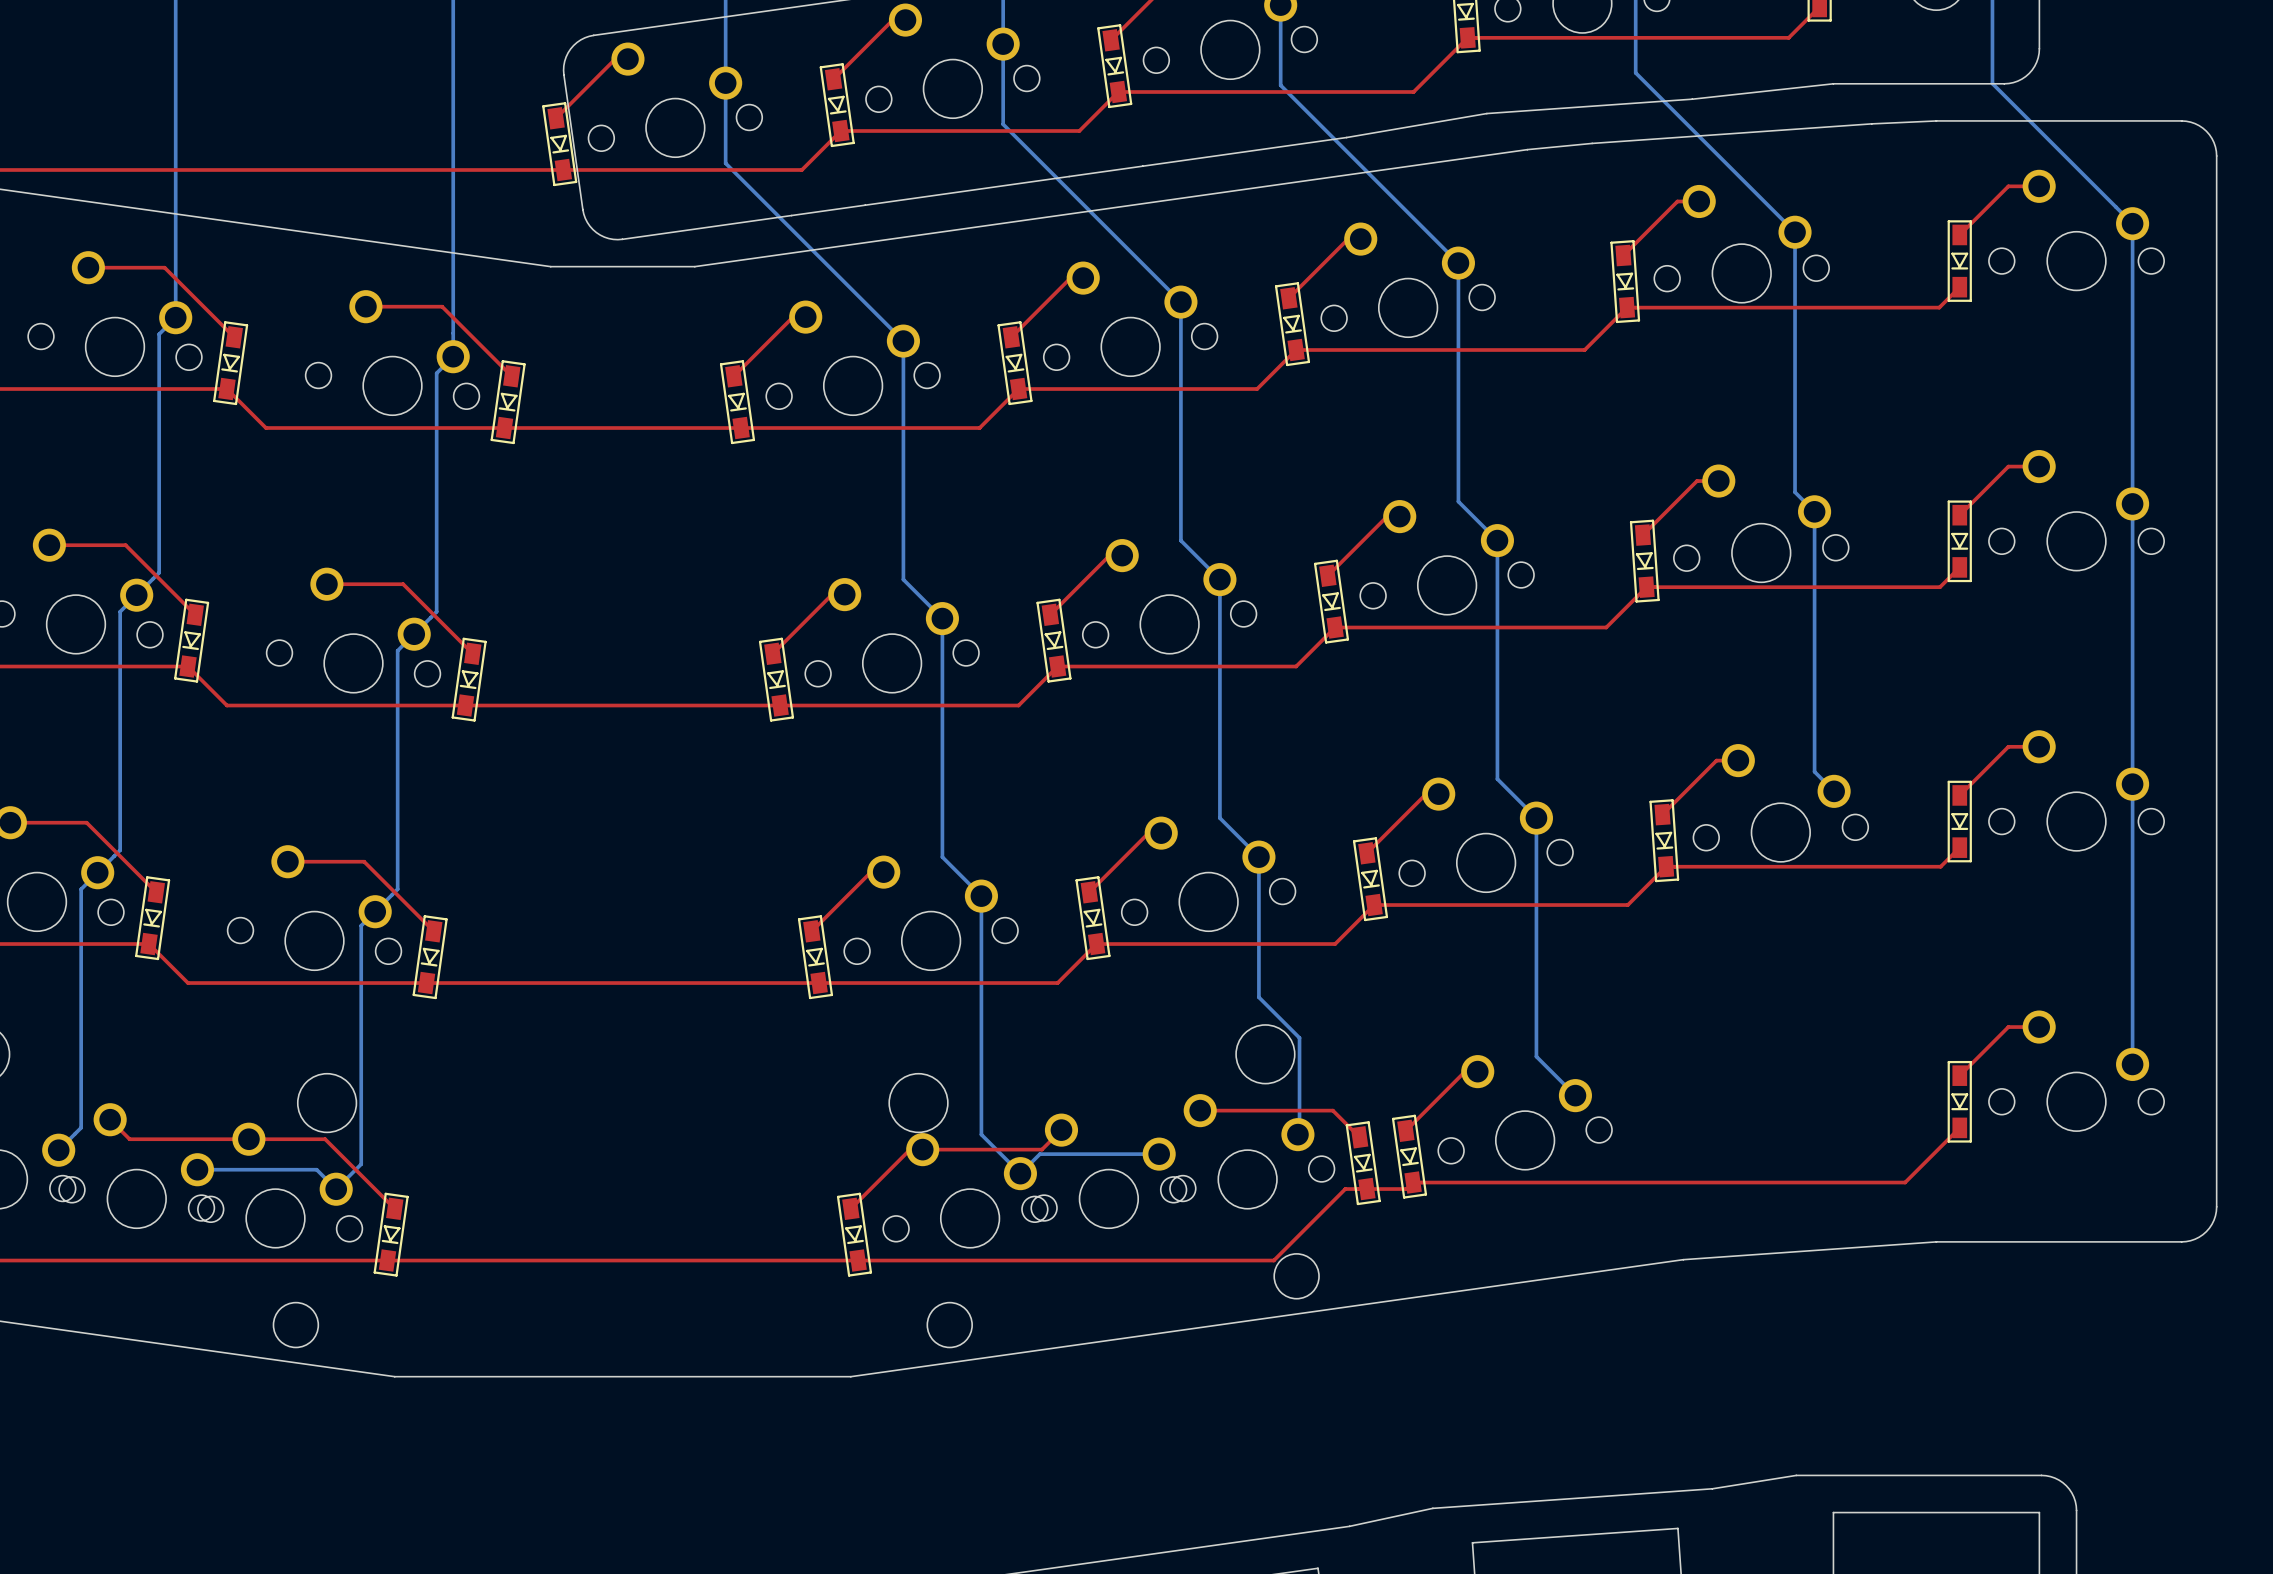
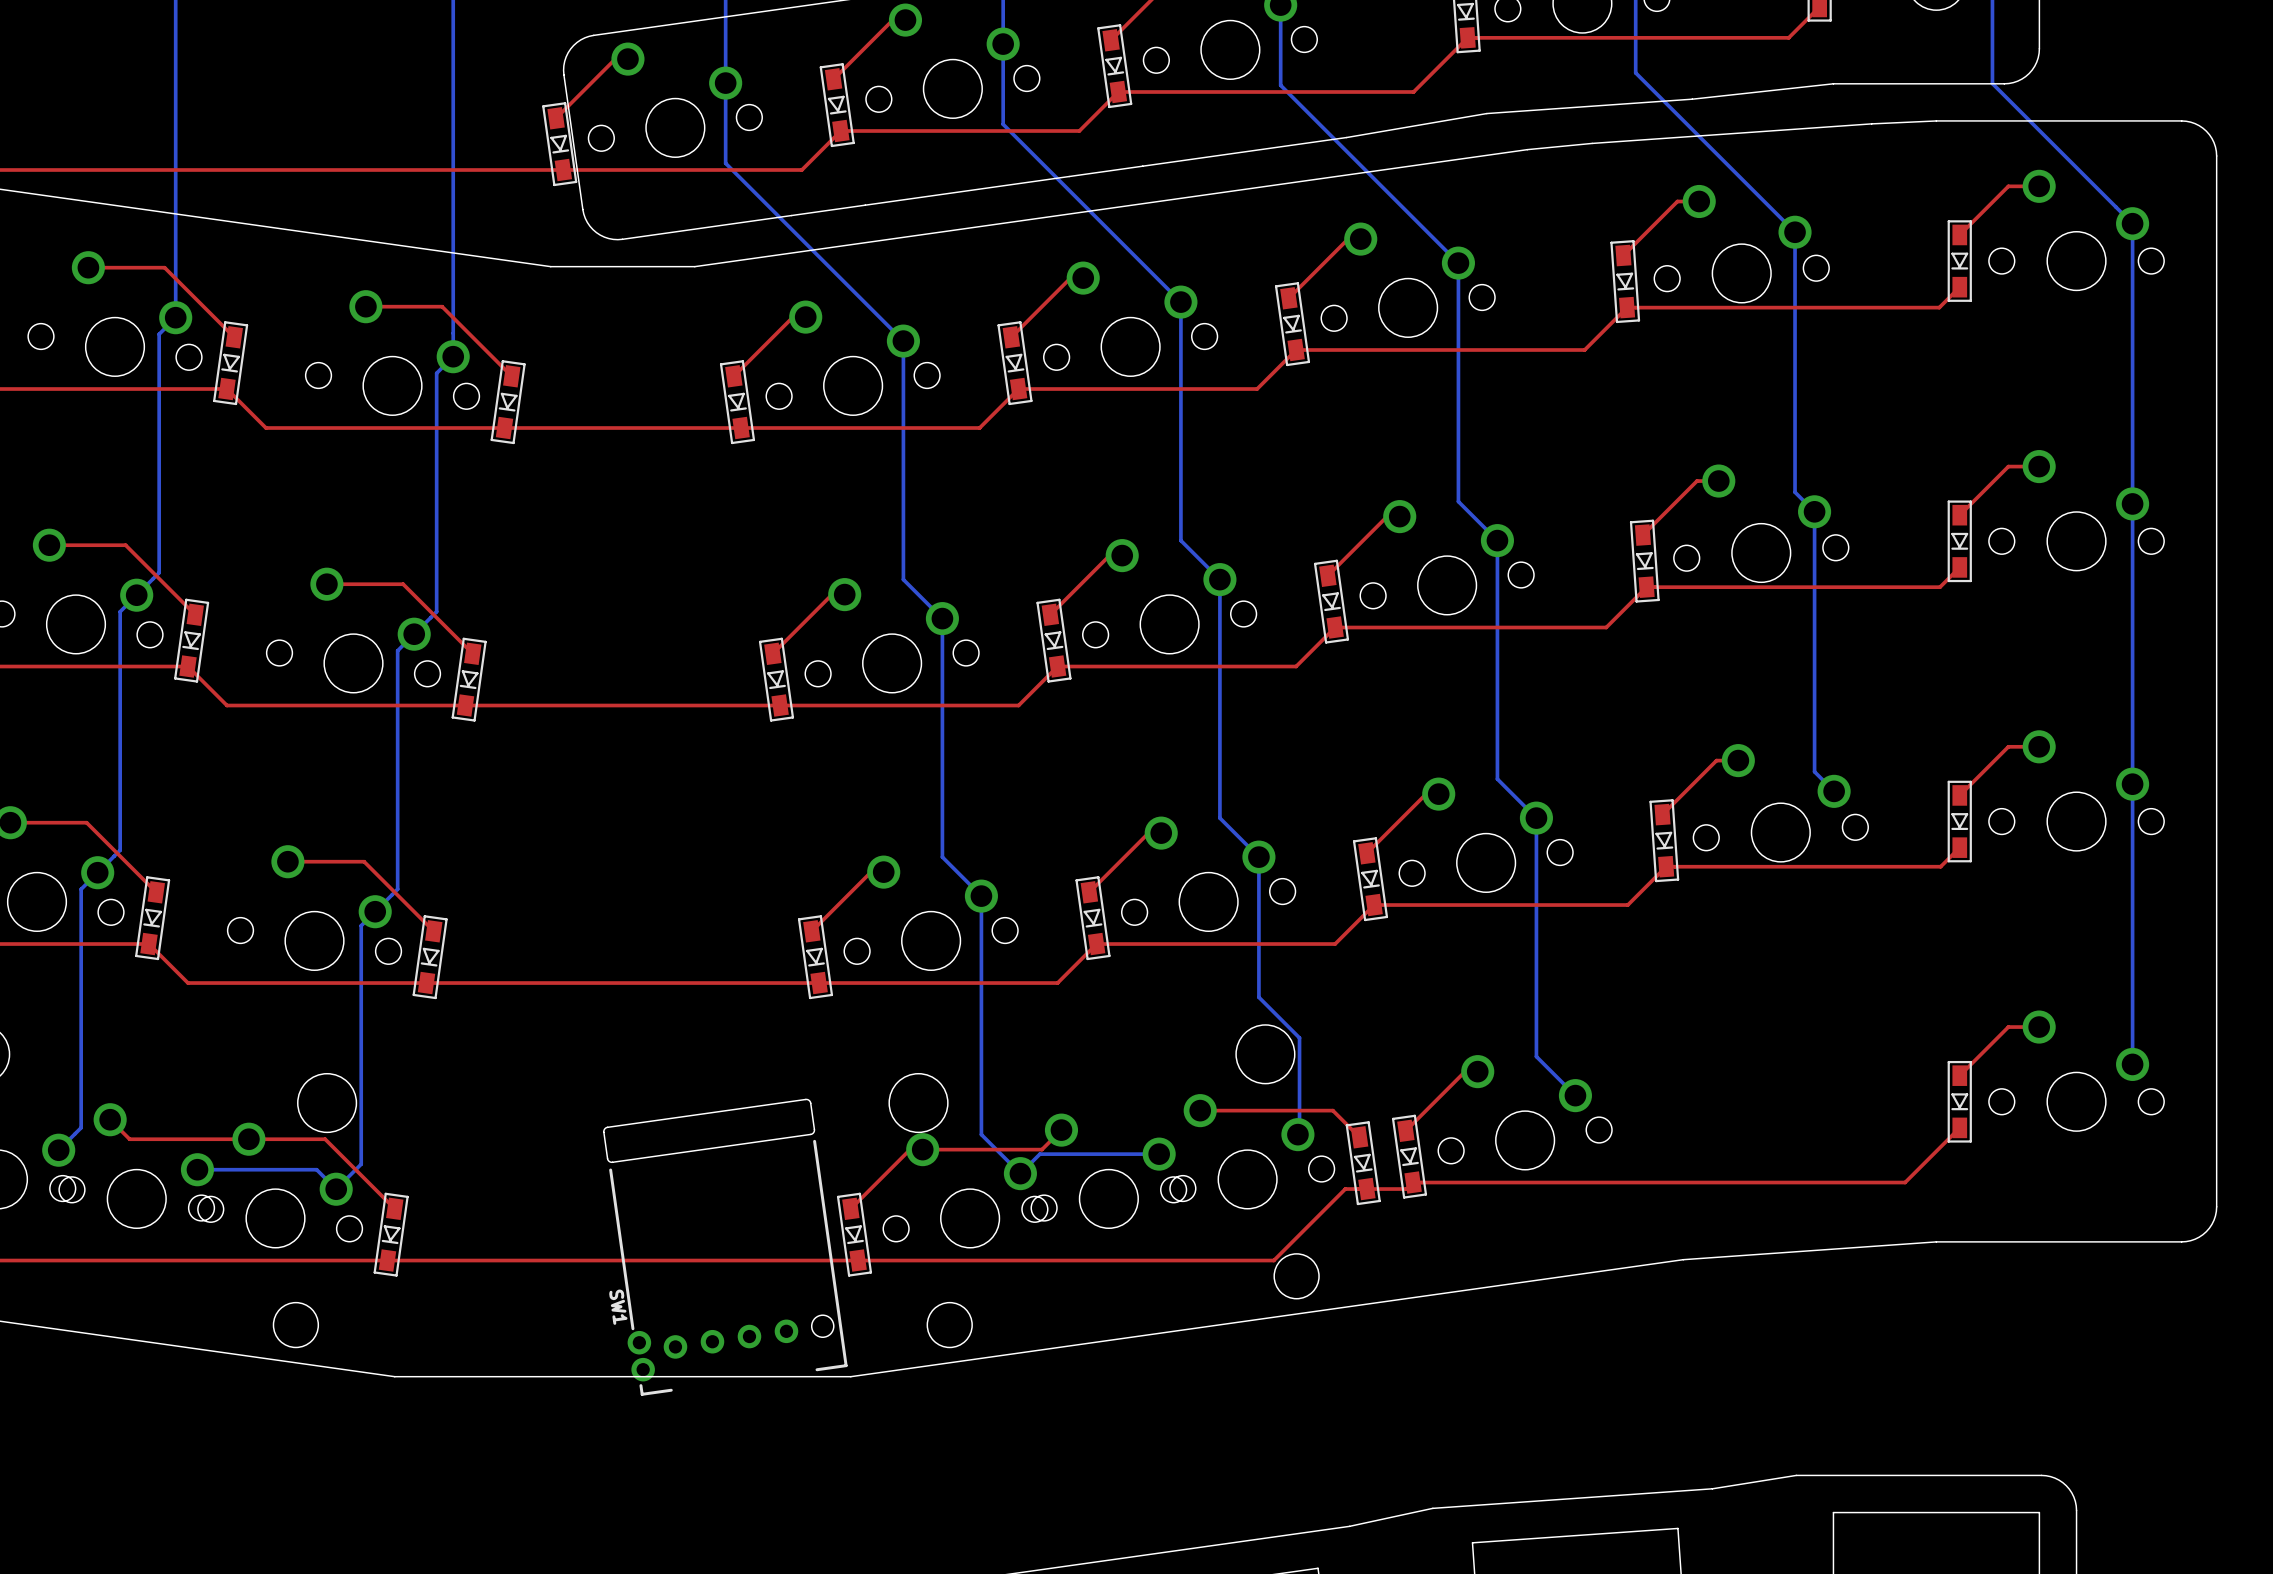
SW1: none -> (725, 1247)

